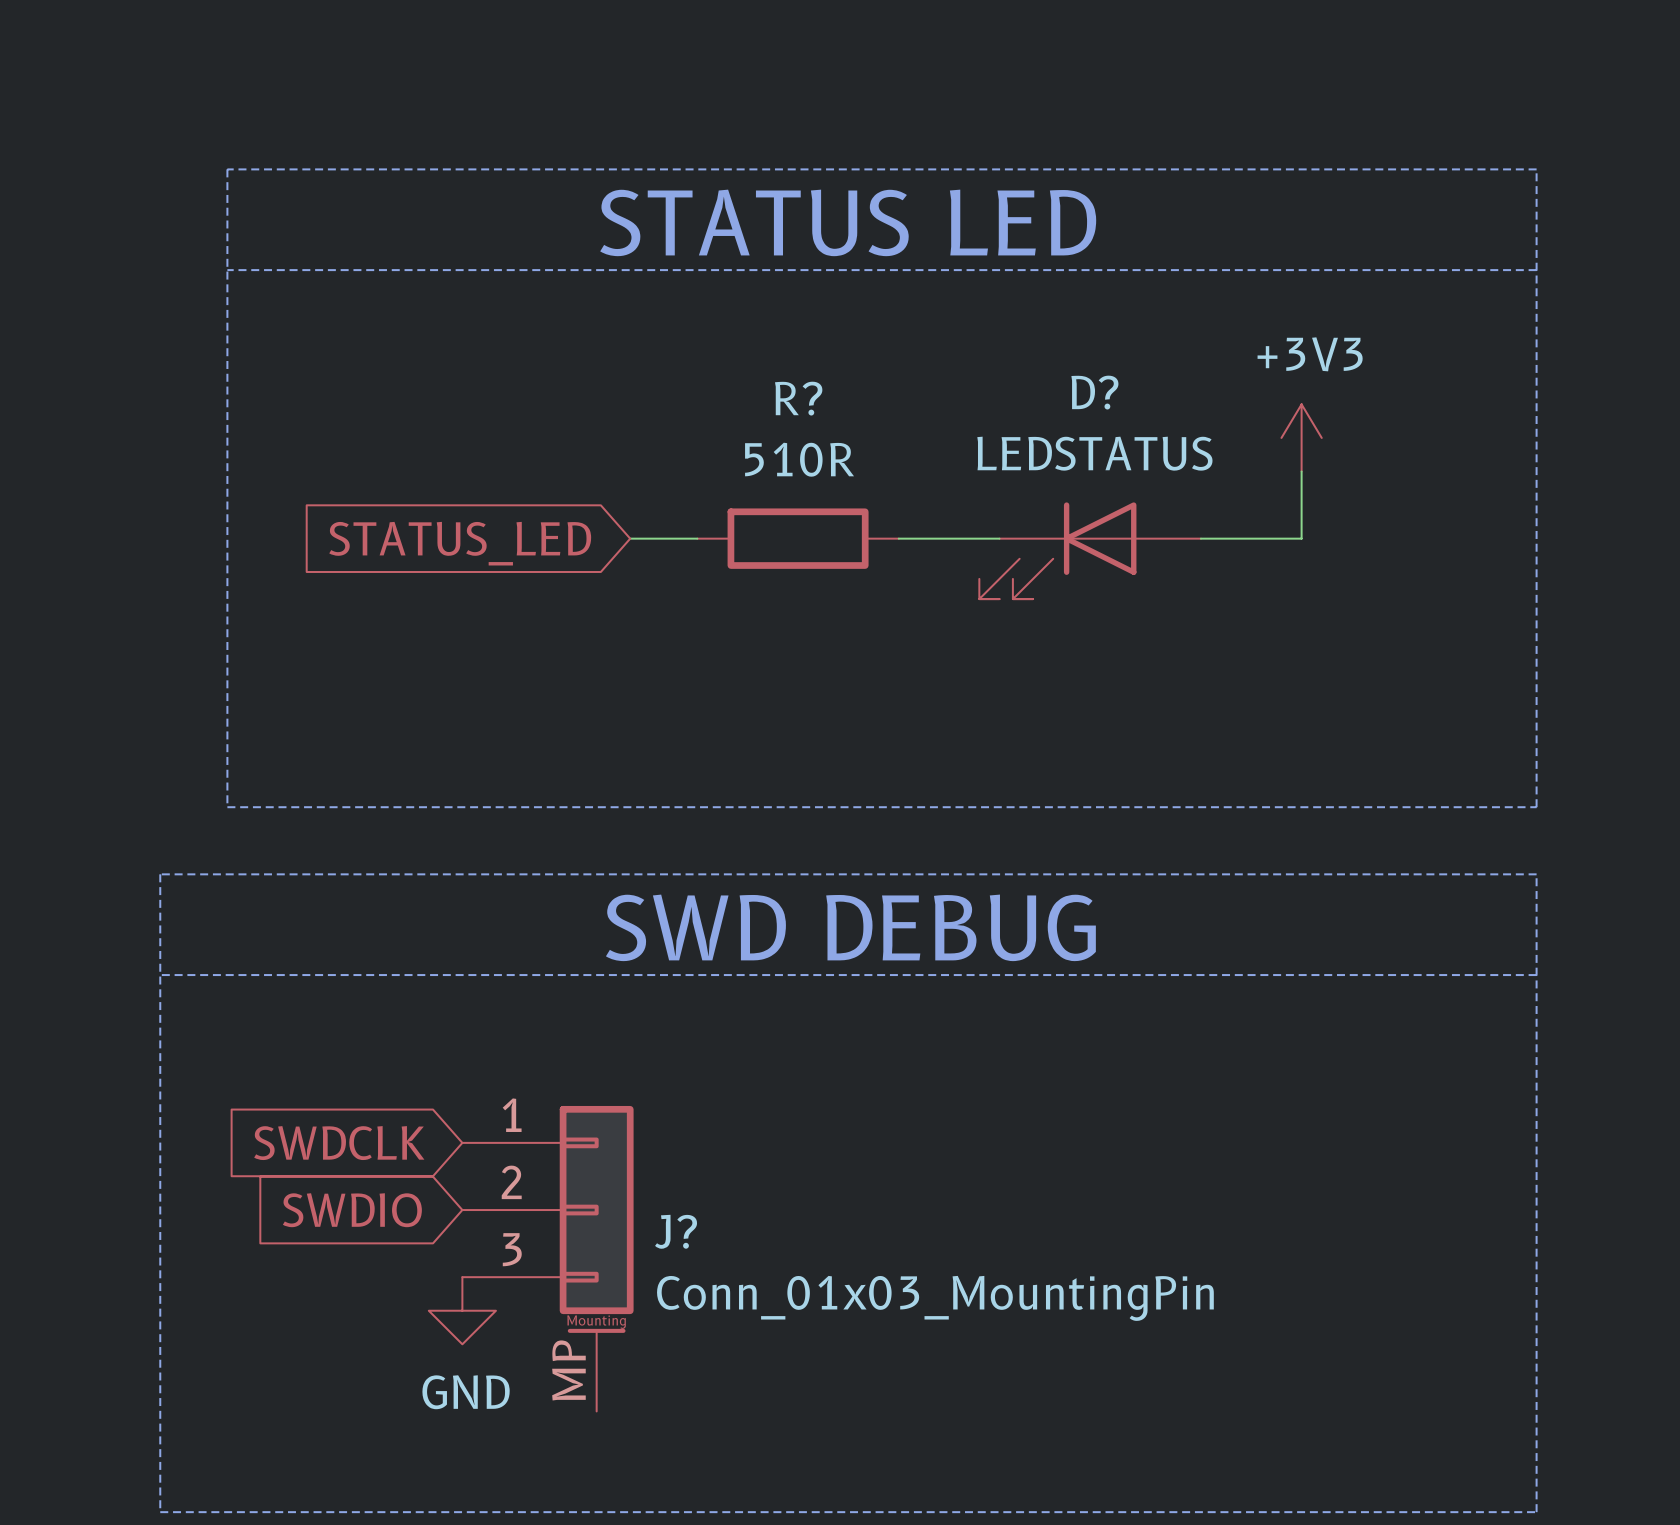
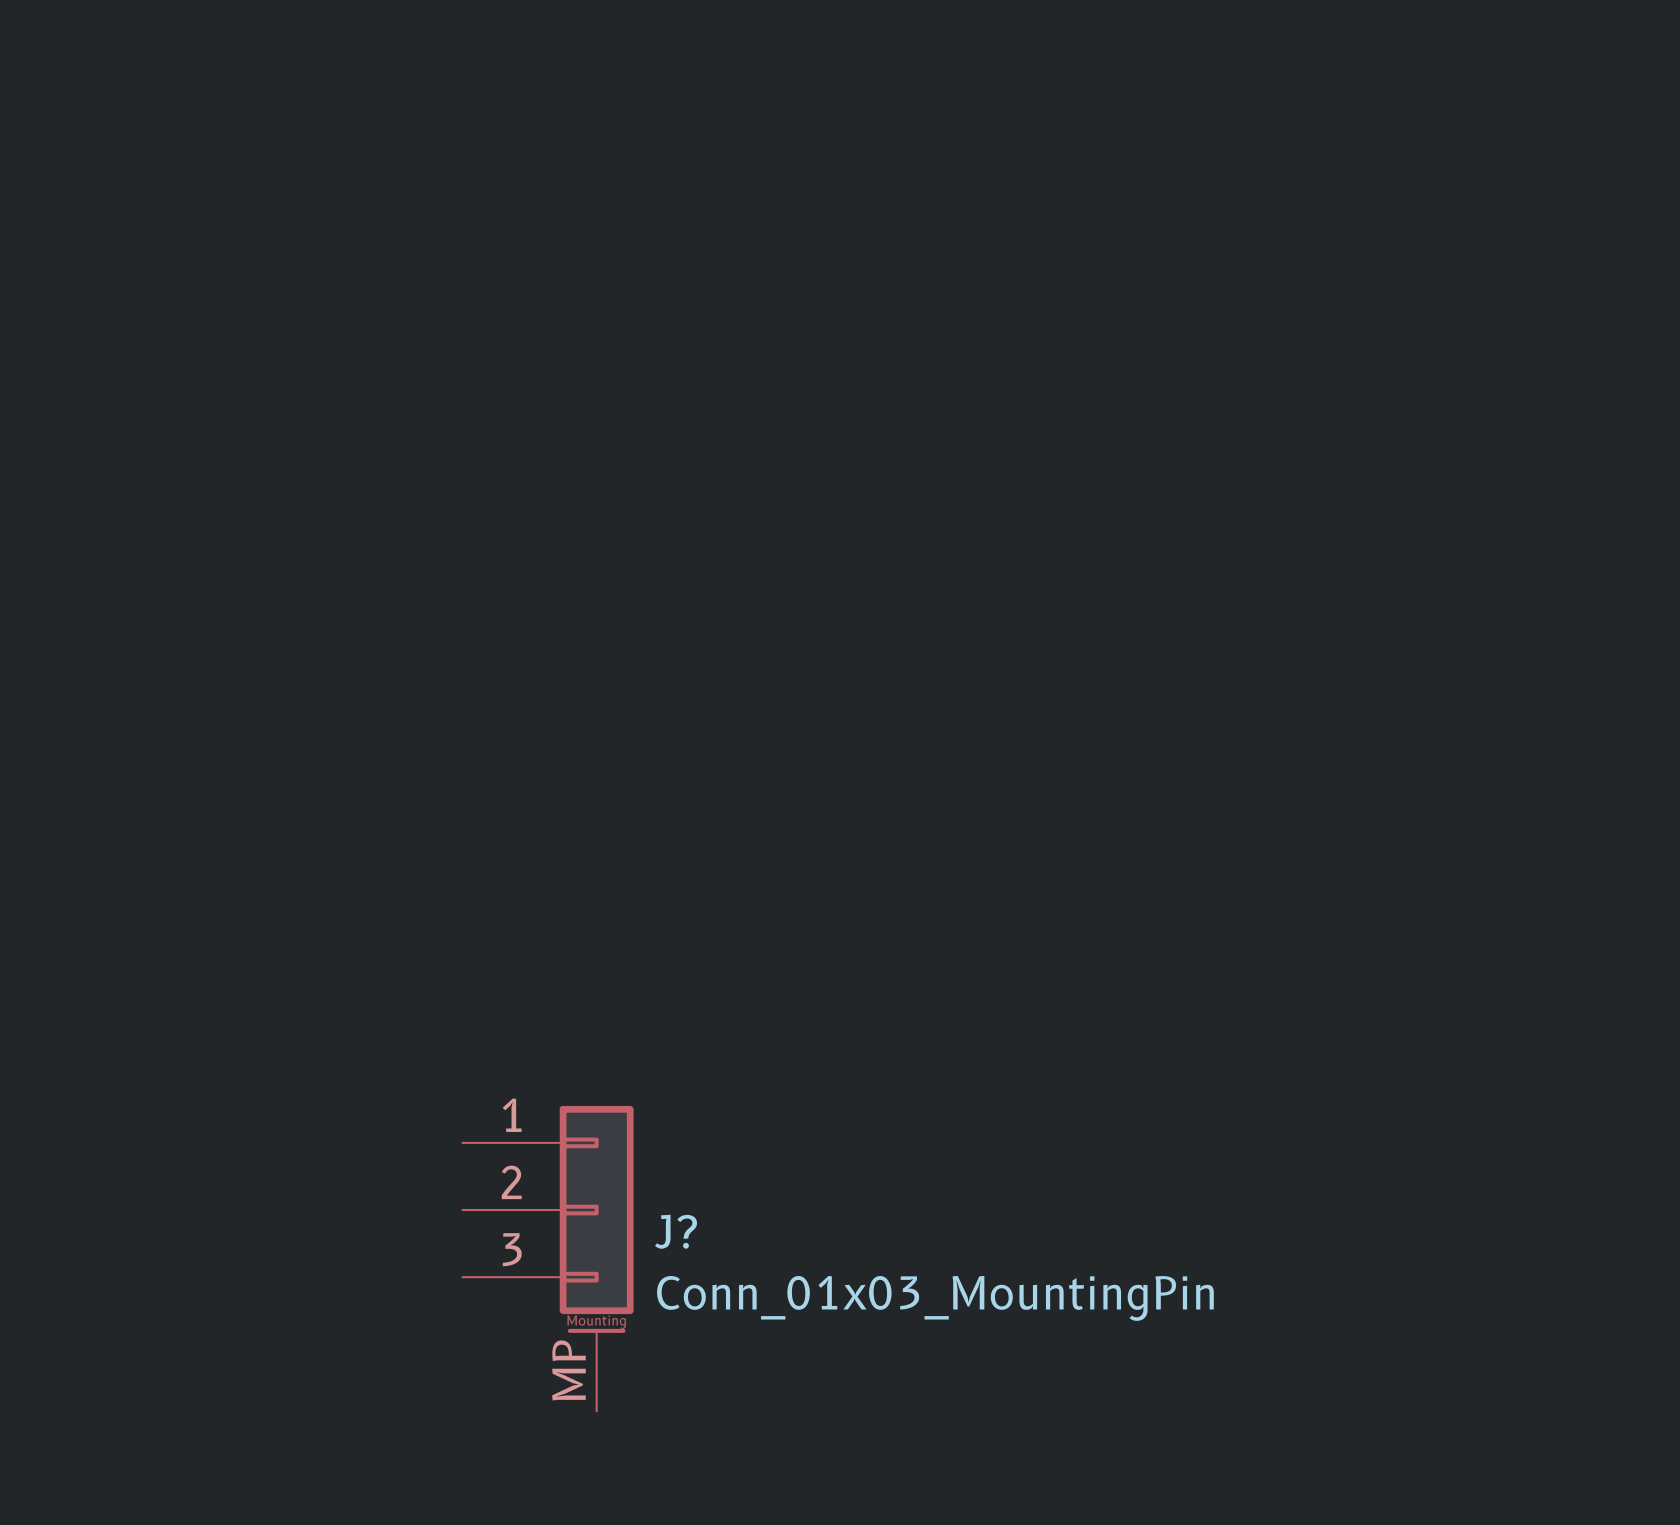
line: (227, 169) (1536, 169) (1536, 807) (227, 807) (227, 169) -> none
text: STATUS LED (848, 222) -> none
line: (227, 270) (1536, 270) -> none
power symbol: +3V3 (1301, 437) -> none
wire: (1301, 471) (1301, 538) (1200, 538) -> none
wire: (630, 538) (697, 538) -> none
R?: 510R (798, 538) -> none
wire: (898, 538) (999, 538) -> none
global label: STATUS_LED (460, 543) -> none
D?: LEDSTATUS (1090, 550) -> none
line: (160, 874) (1536, 874) (1536, 1512) (160, 1512) (160, 874) -> none
text: SWD DEBUG (850, 927) -> none
line: (160, 975) (1536, 975) -> none
global label: SWDCLK (339, 1143) -> none
global label: SWDIO (352, 1210) -> none
power symbol: GND (462, 1310) -> none

